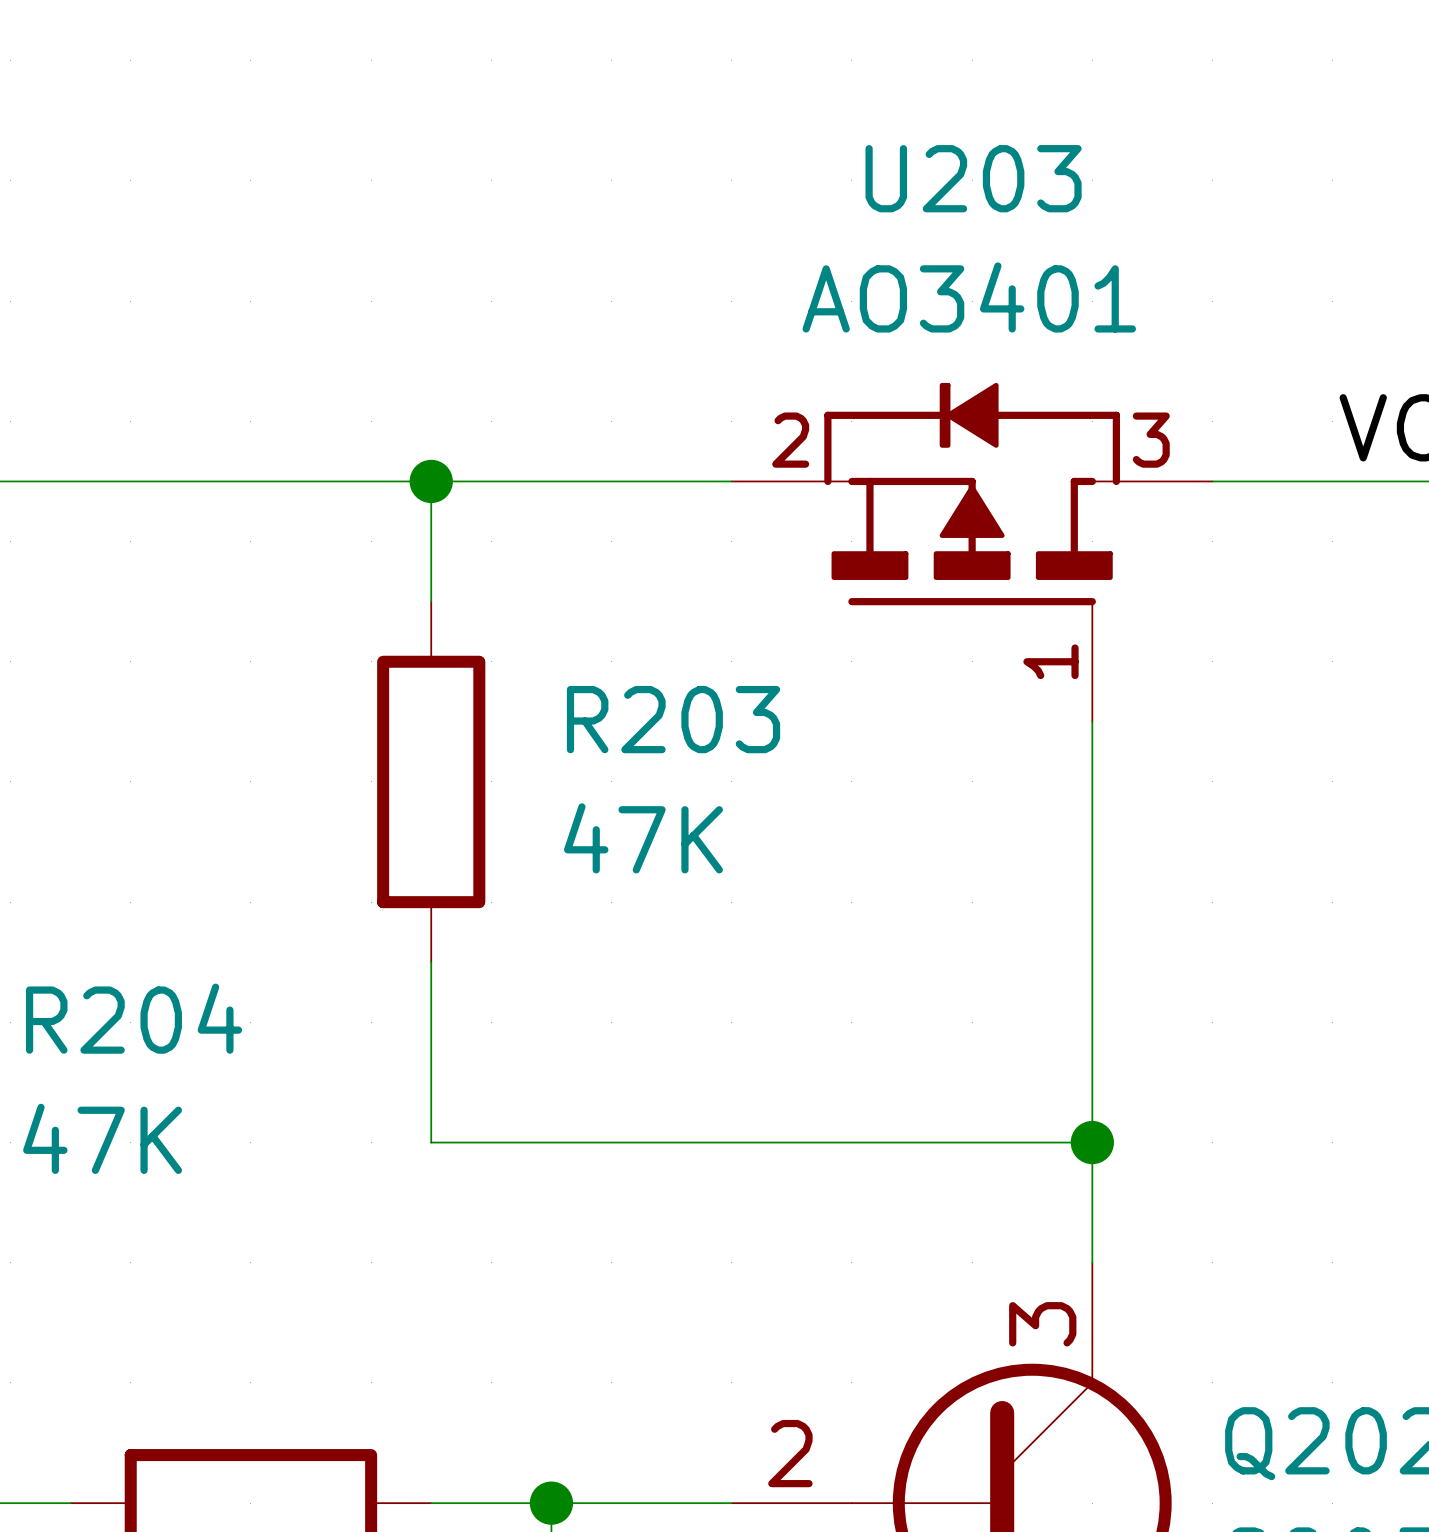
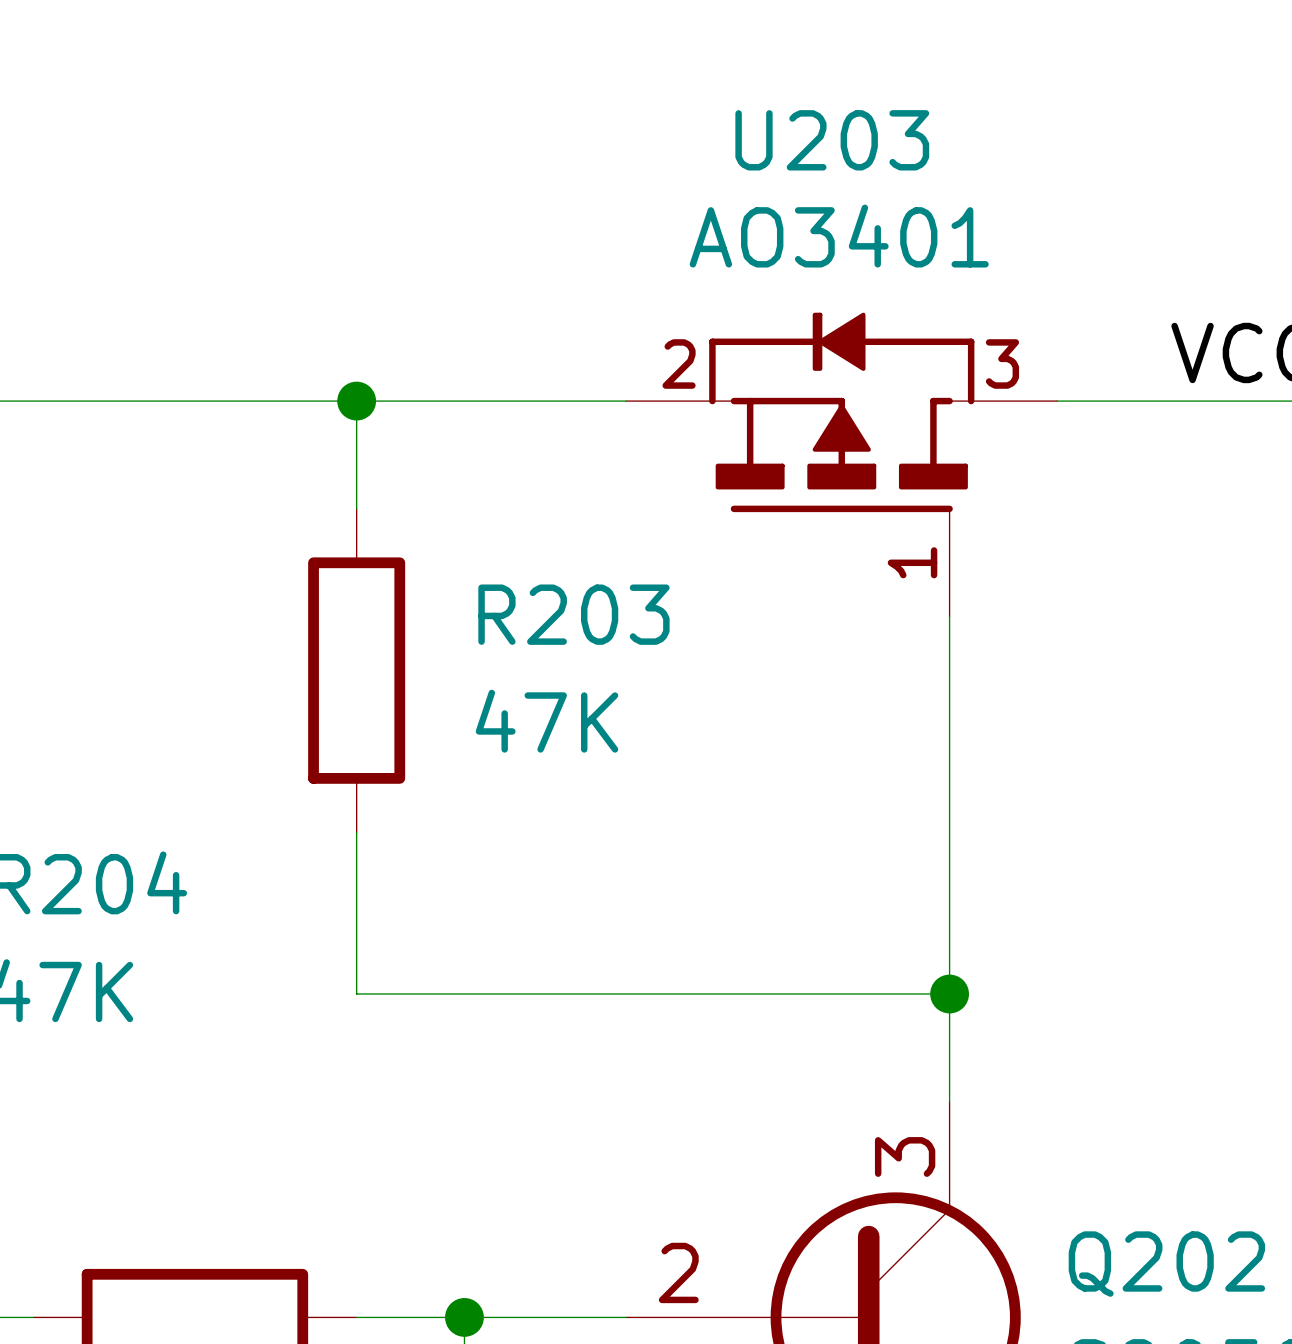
U203 name position: U203 (973, 178) -> U203 (832, 140)

